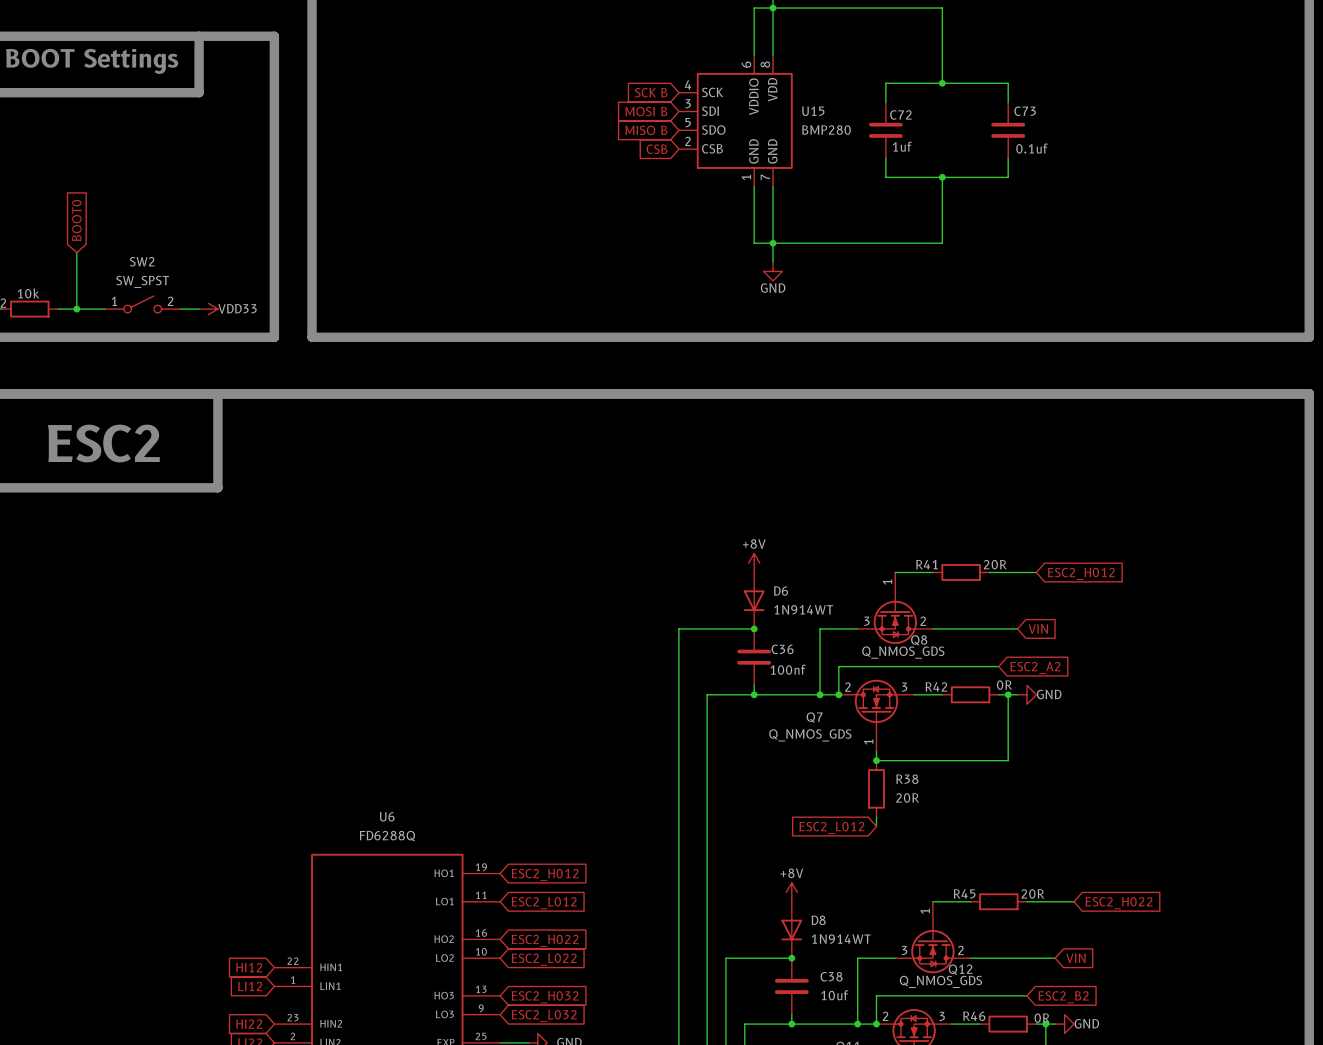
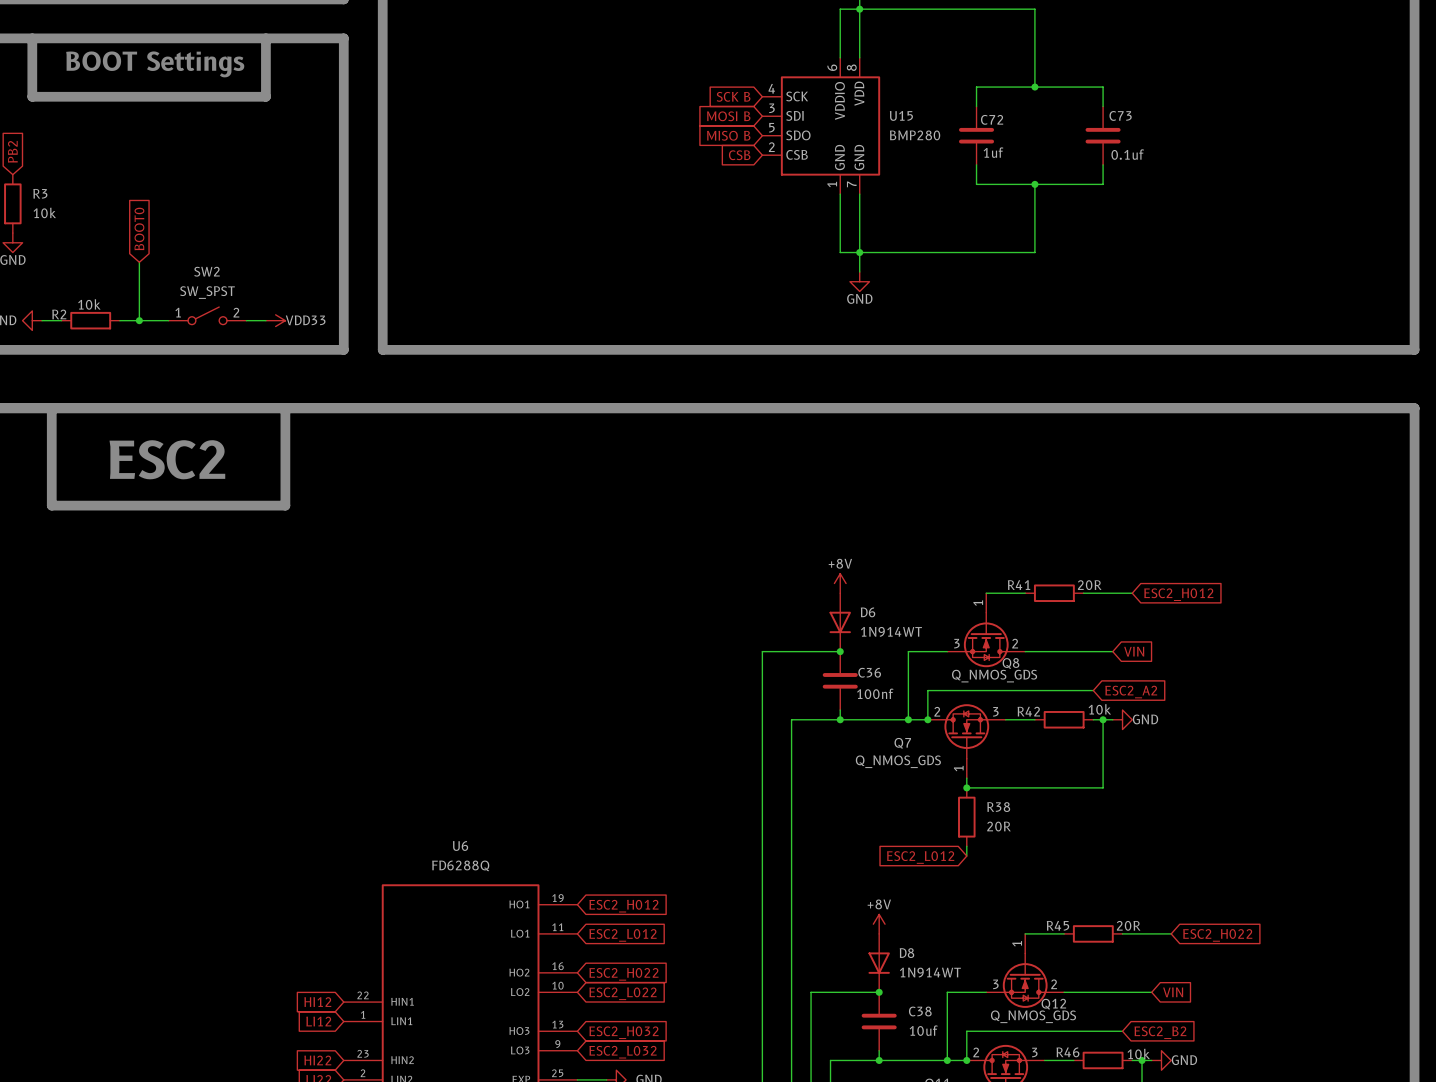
R42 value: 0R (1004, 685) -> 10k (1099, 709)
R46 value: 0R (1042, 1018) -> 10k (1138, 1054)

